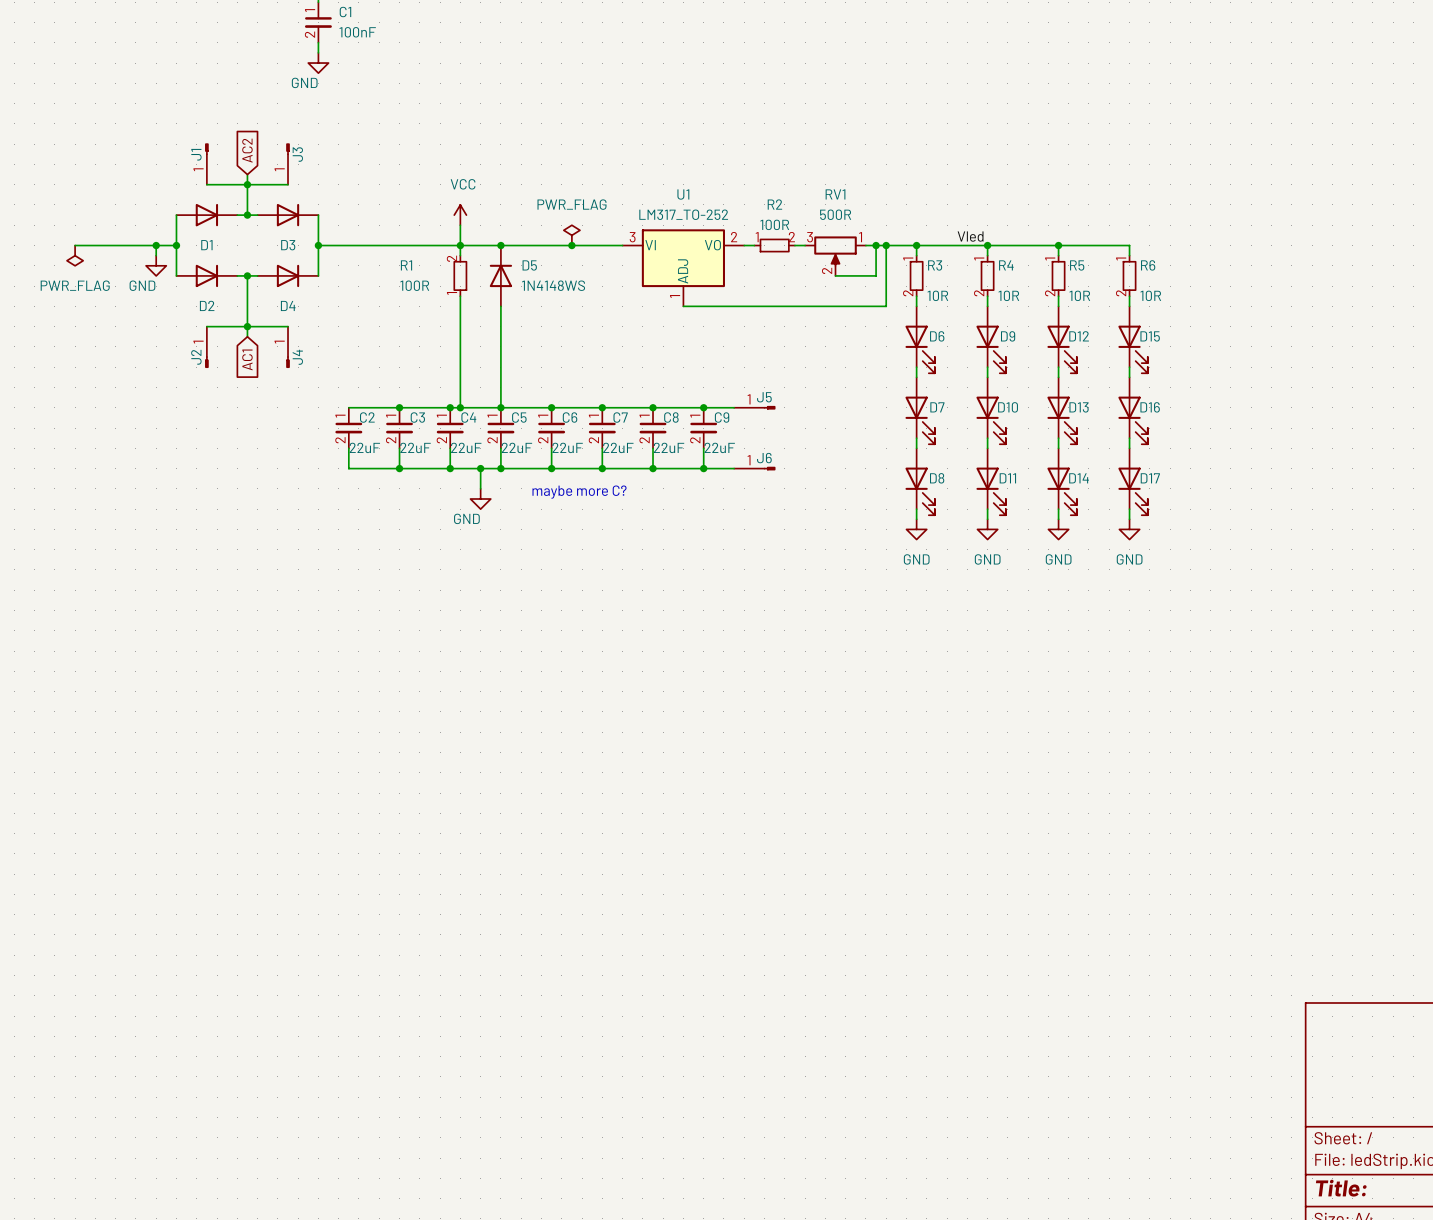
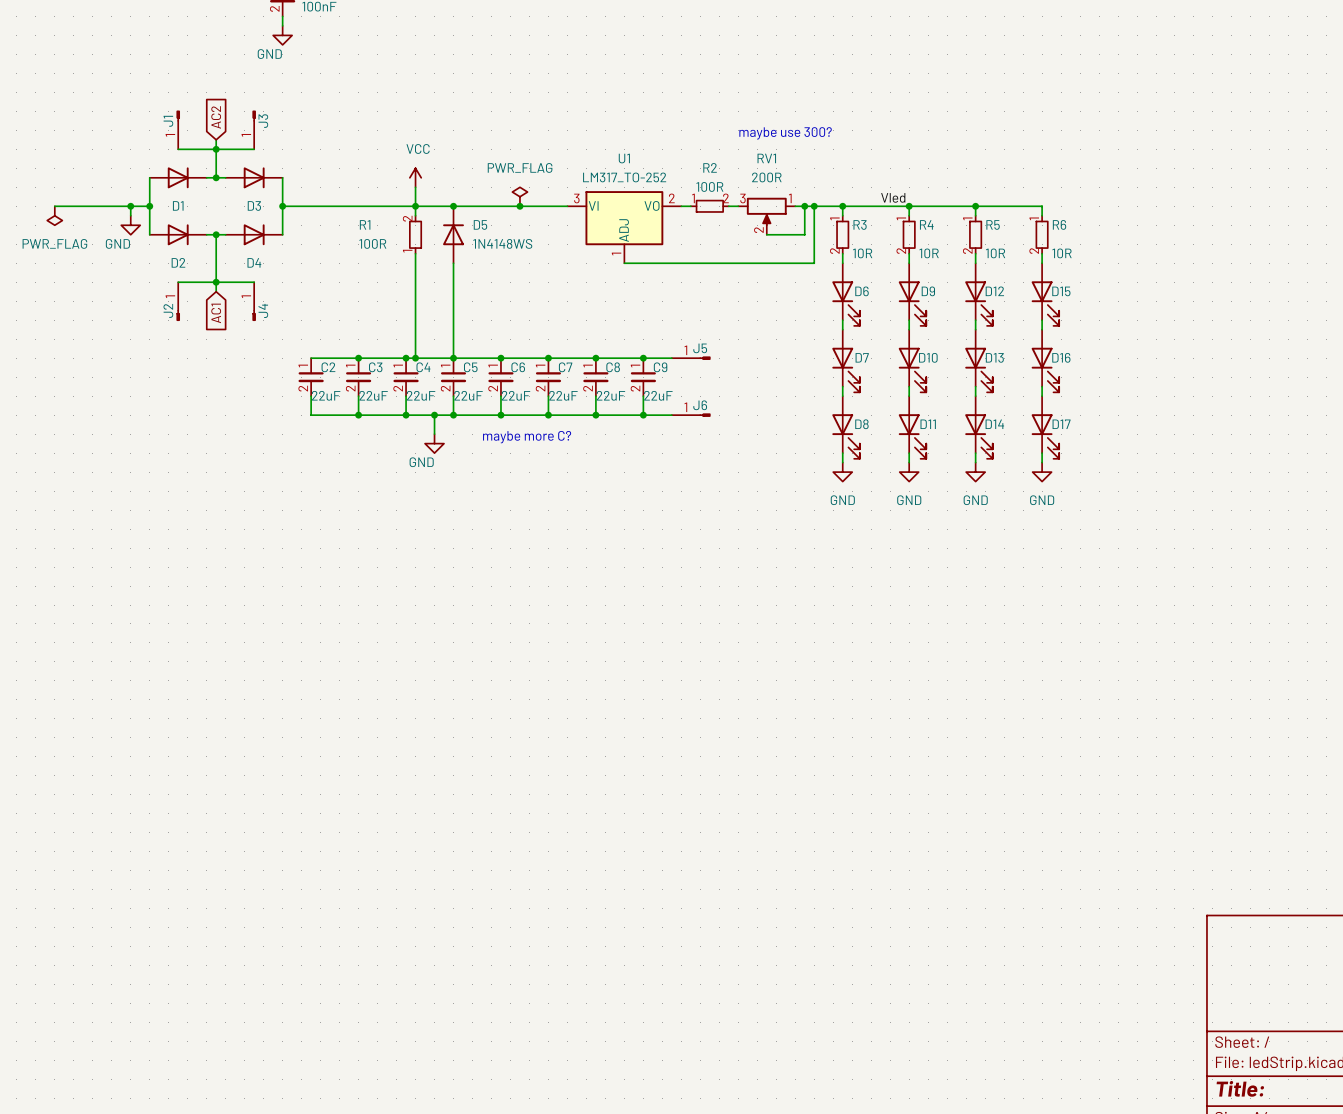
text: none -> maybe use 300? (785, 133)
RV1 value: 500R (835, 214) -> 200R (766, 177)

